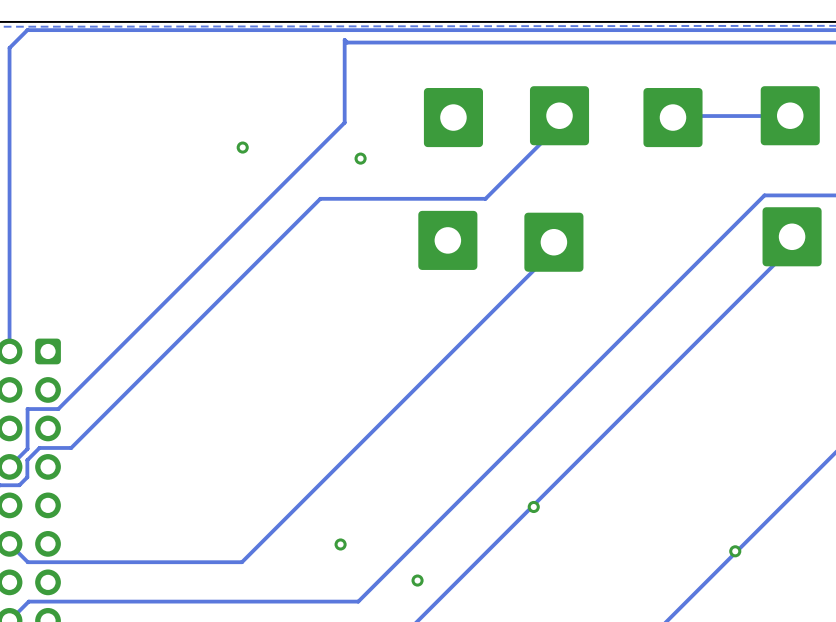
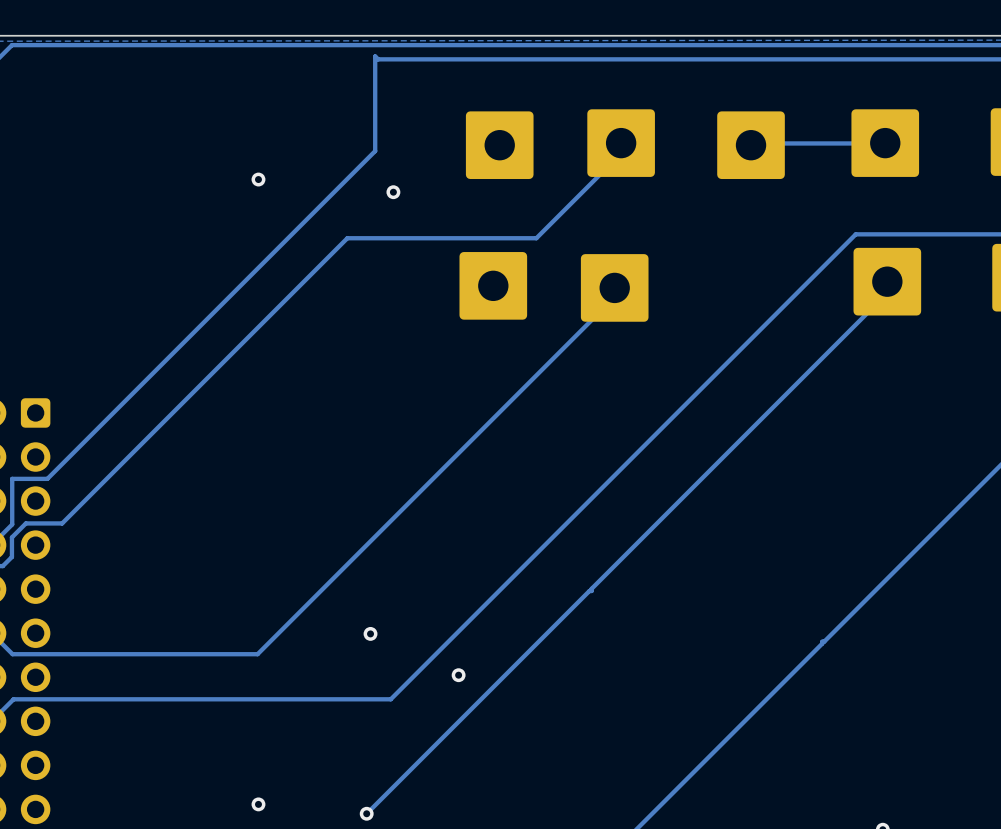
via: (533, 506) -> none
via: (735, 551) -> none

